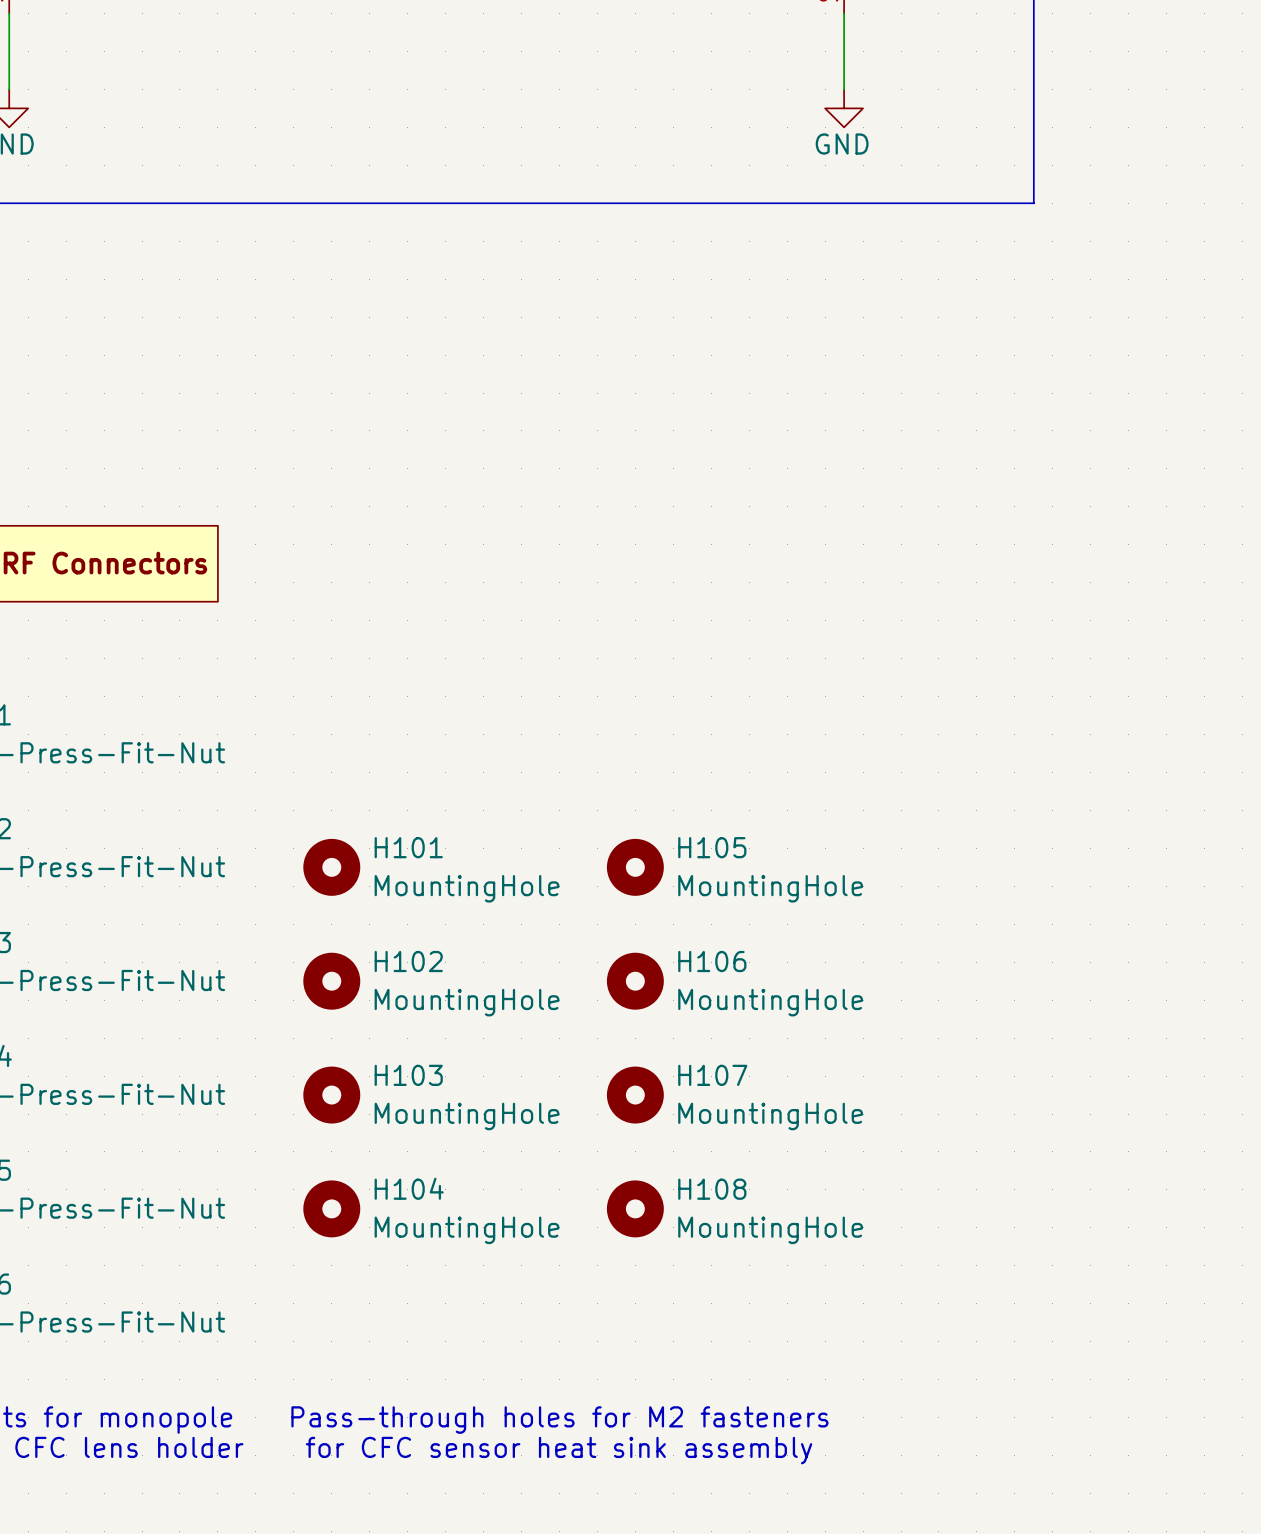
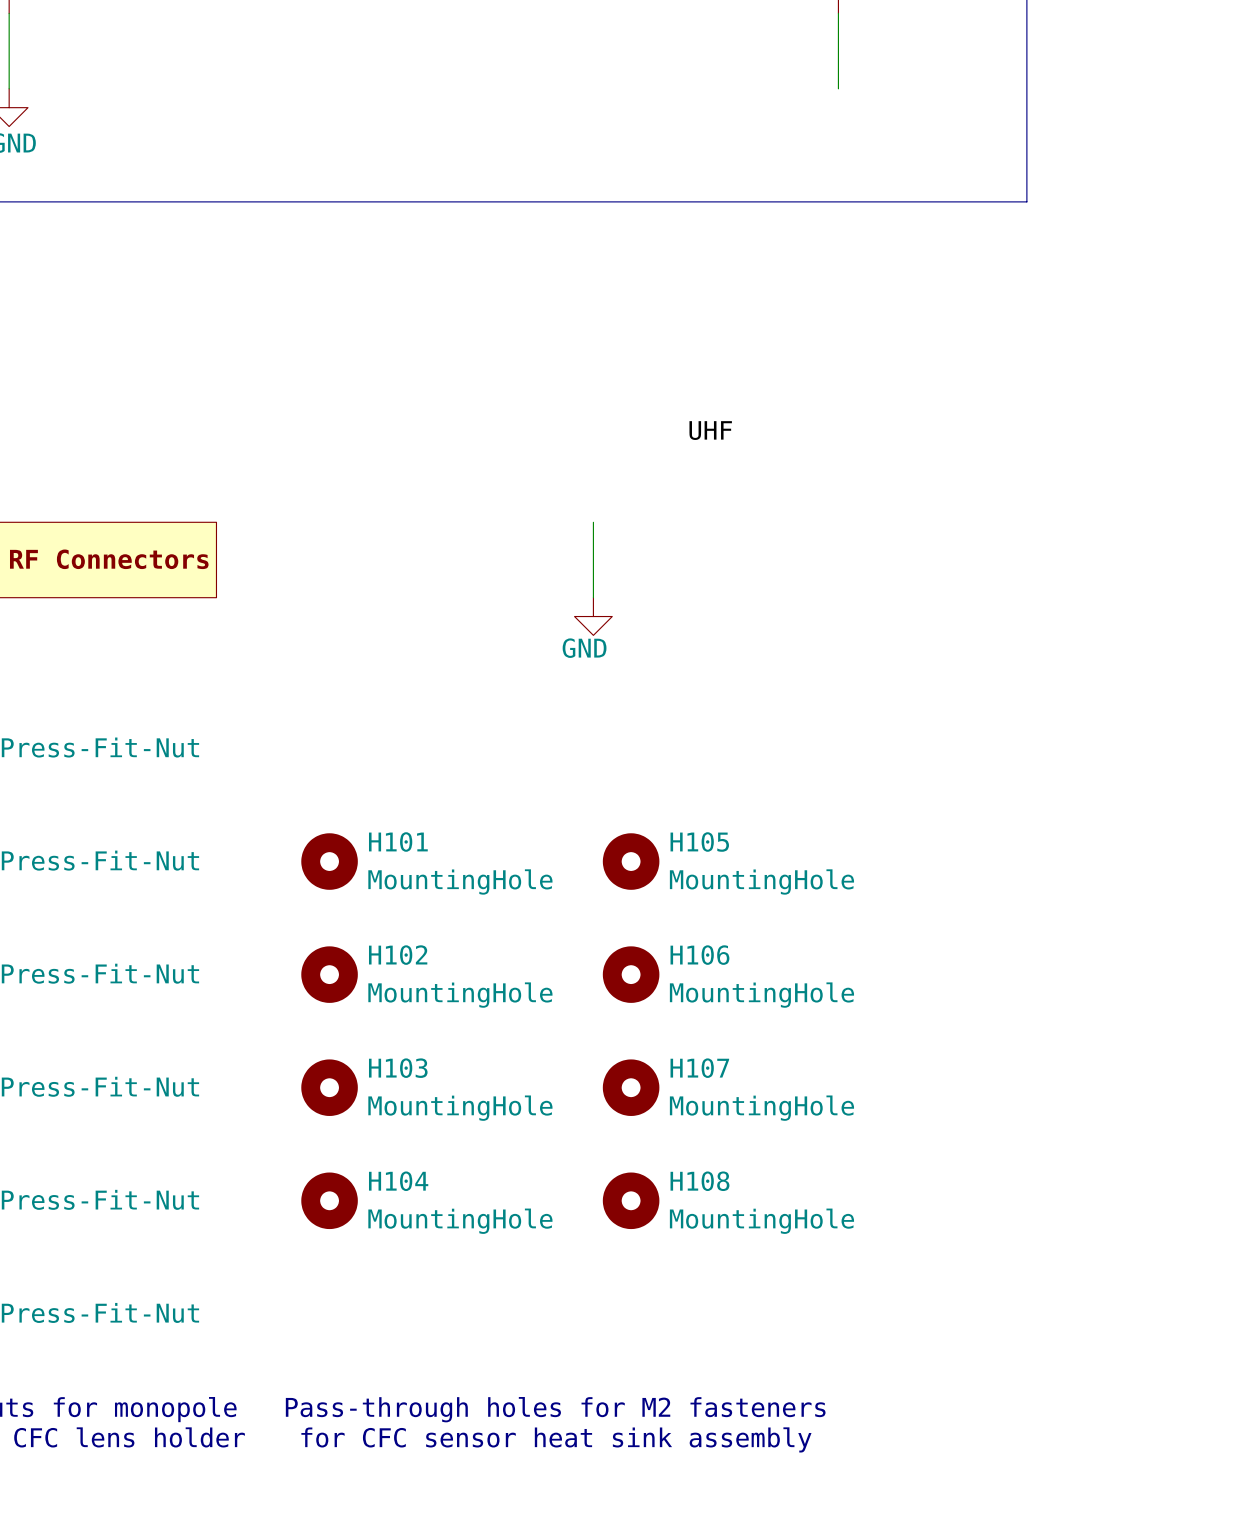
power symbol: GND (844, 108) -> none
label: none -> UHF (710, 430)
wire: none -> (593, 522) (593, 597)
power symbol: none -> GND (593, 616)

